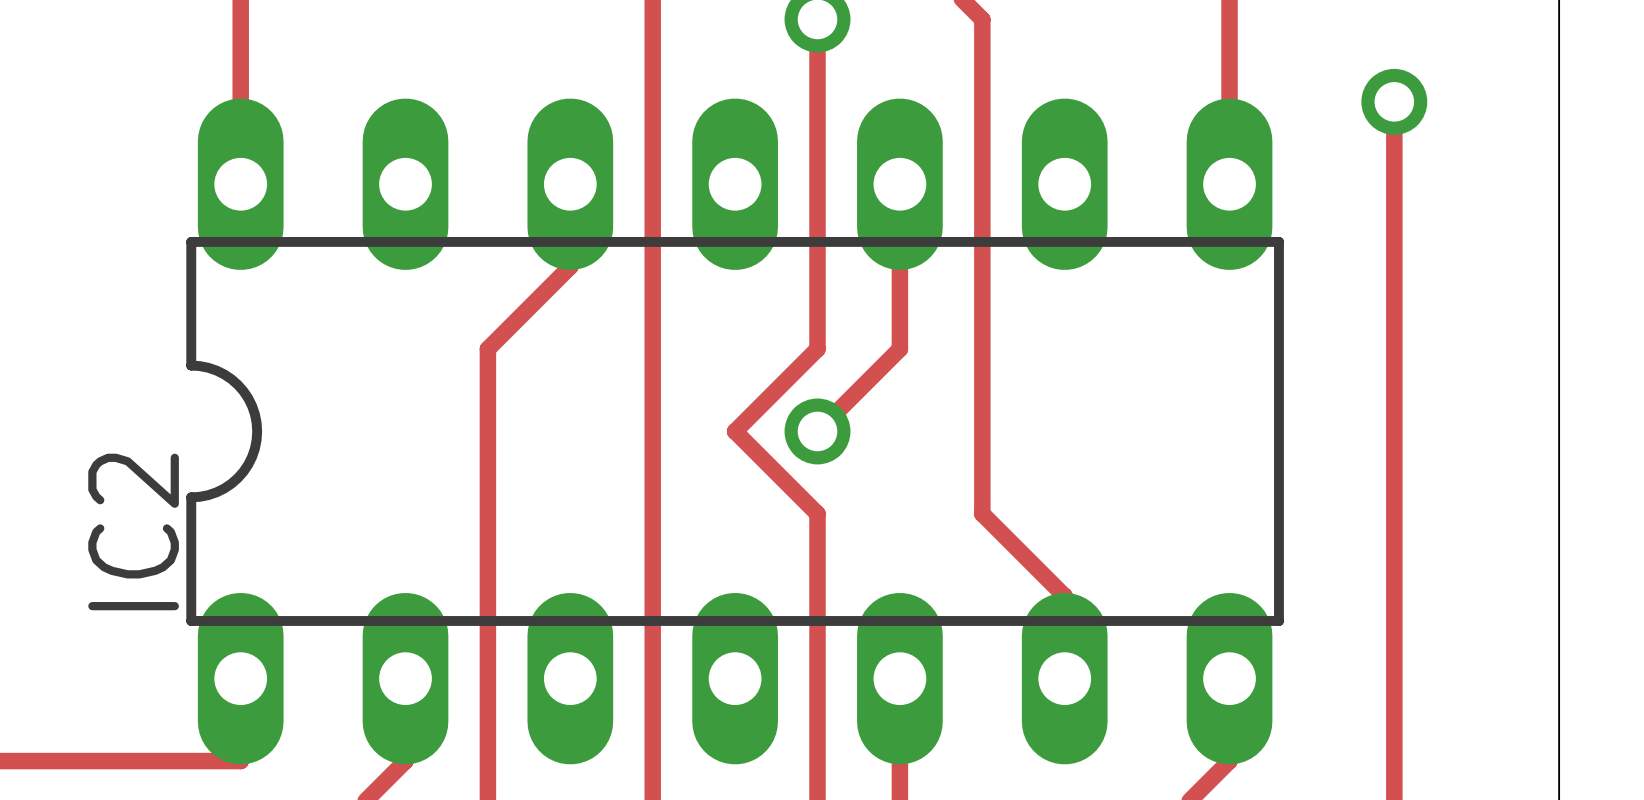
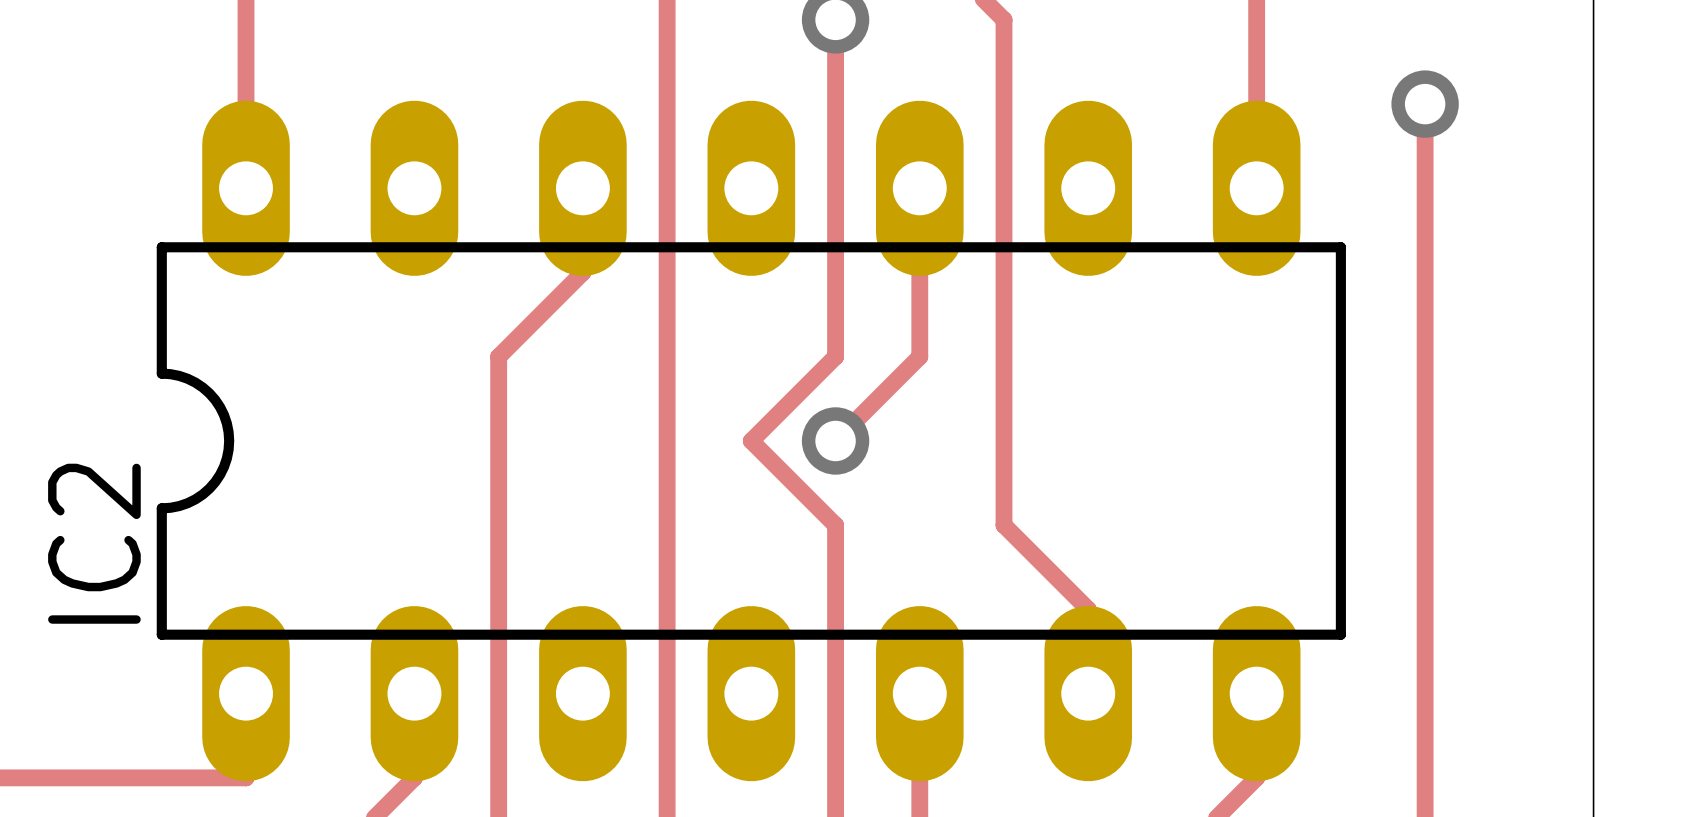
IC2 footprint: [186, 98, 1284, 765] -> [156, 100, 1346, 782]
IC2 name position: IC2 (133, 531) -> IC2 (94, 543)

